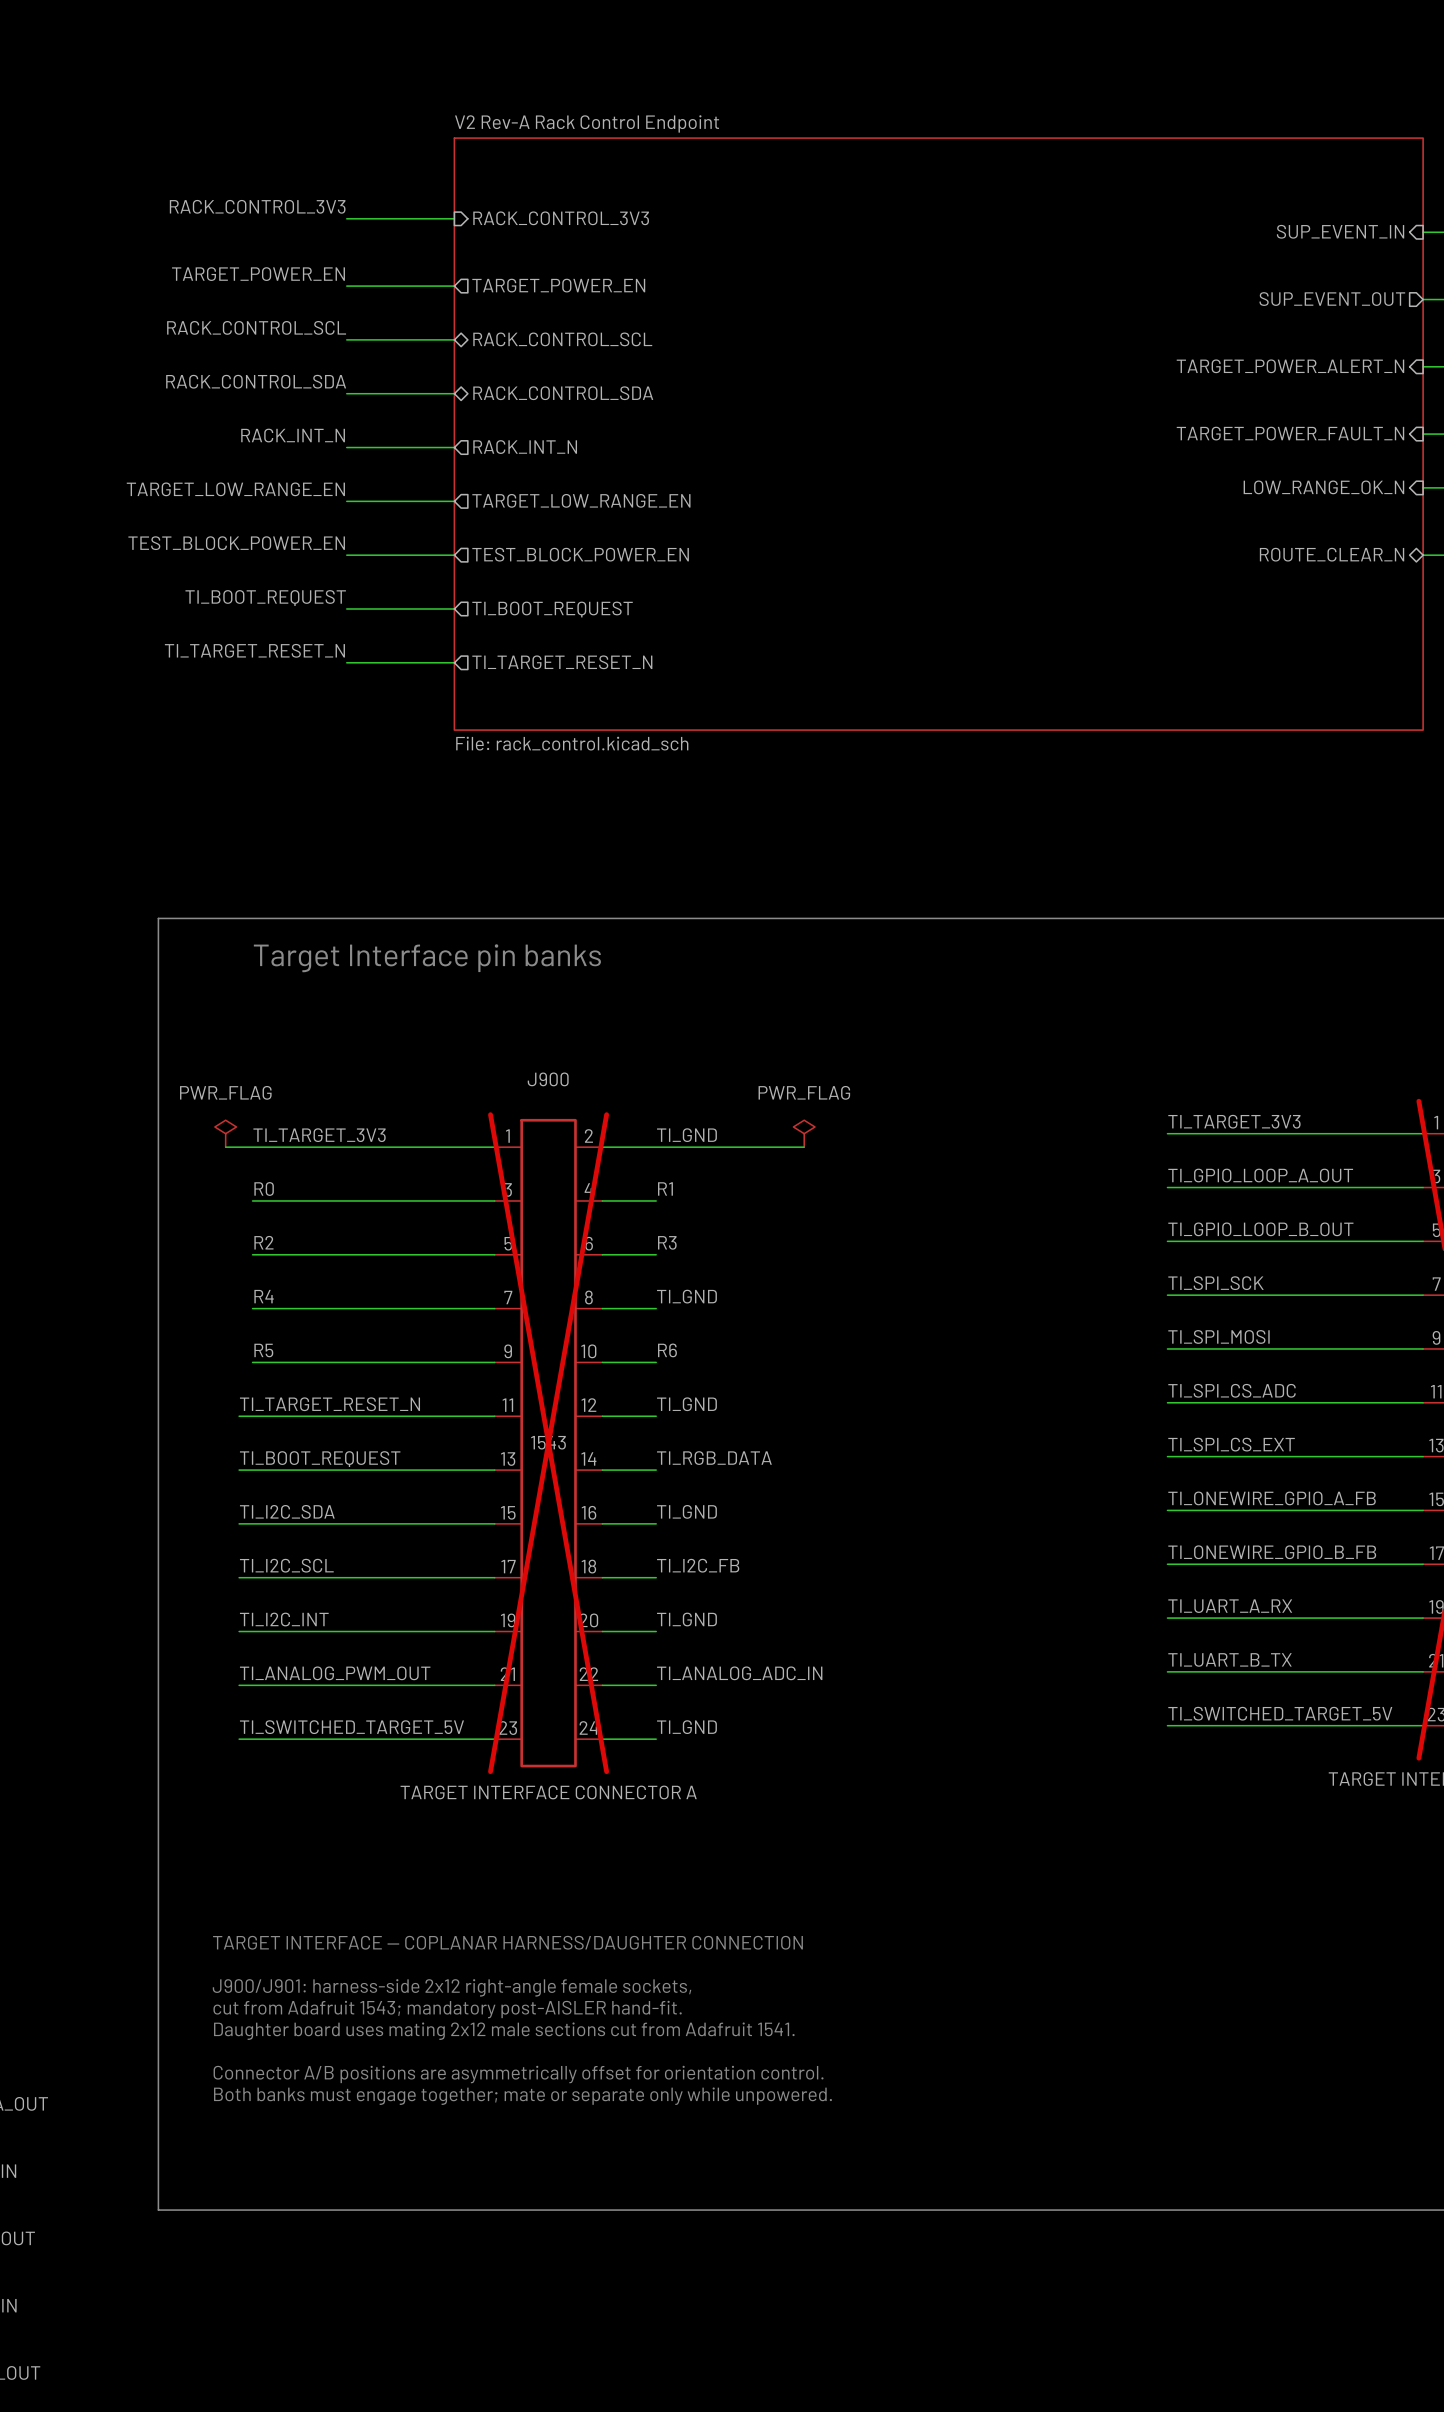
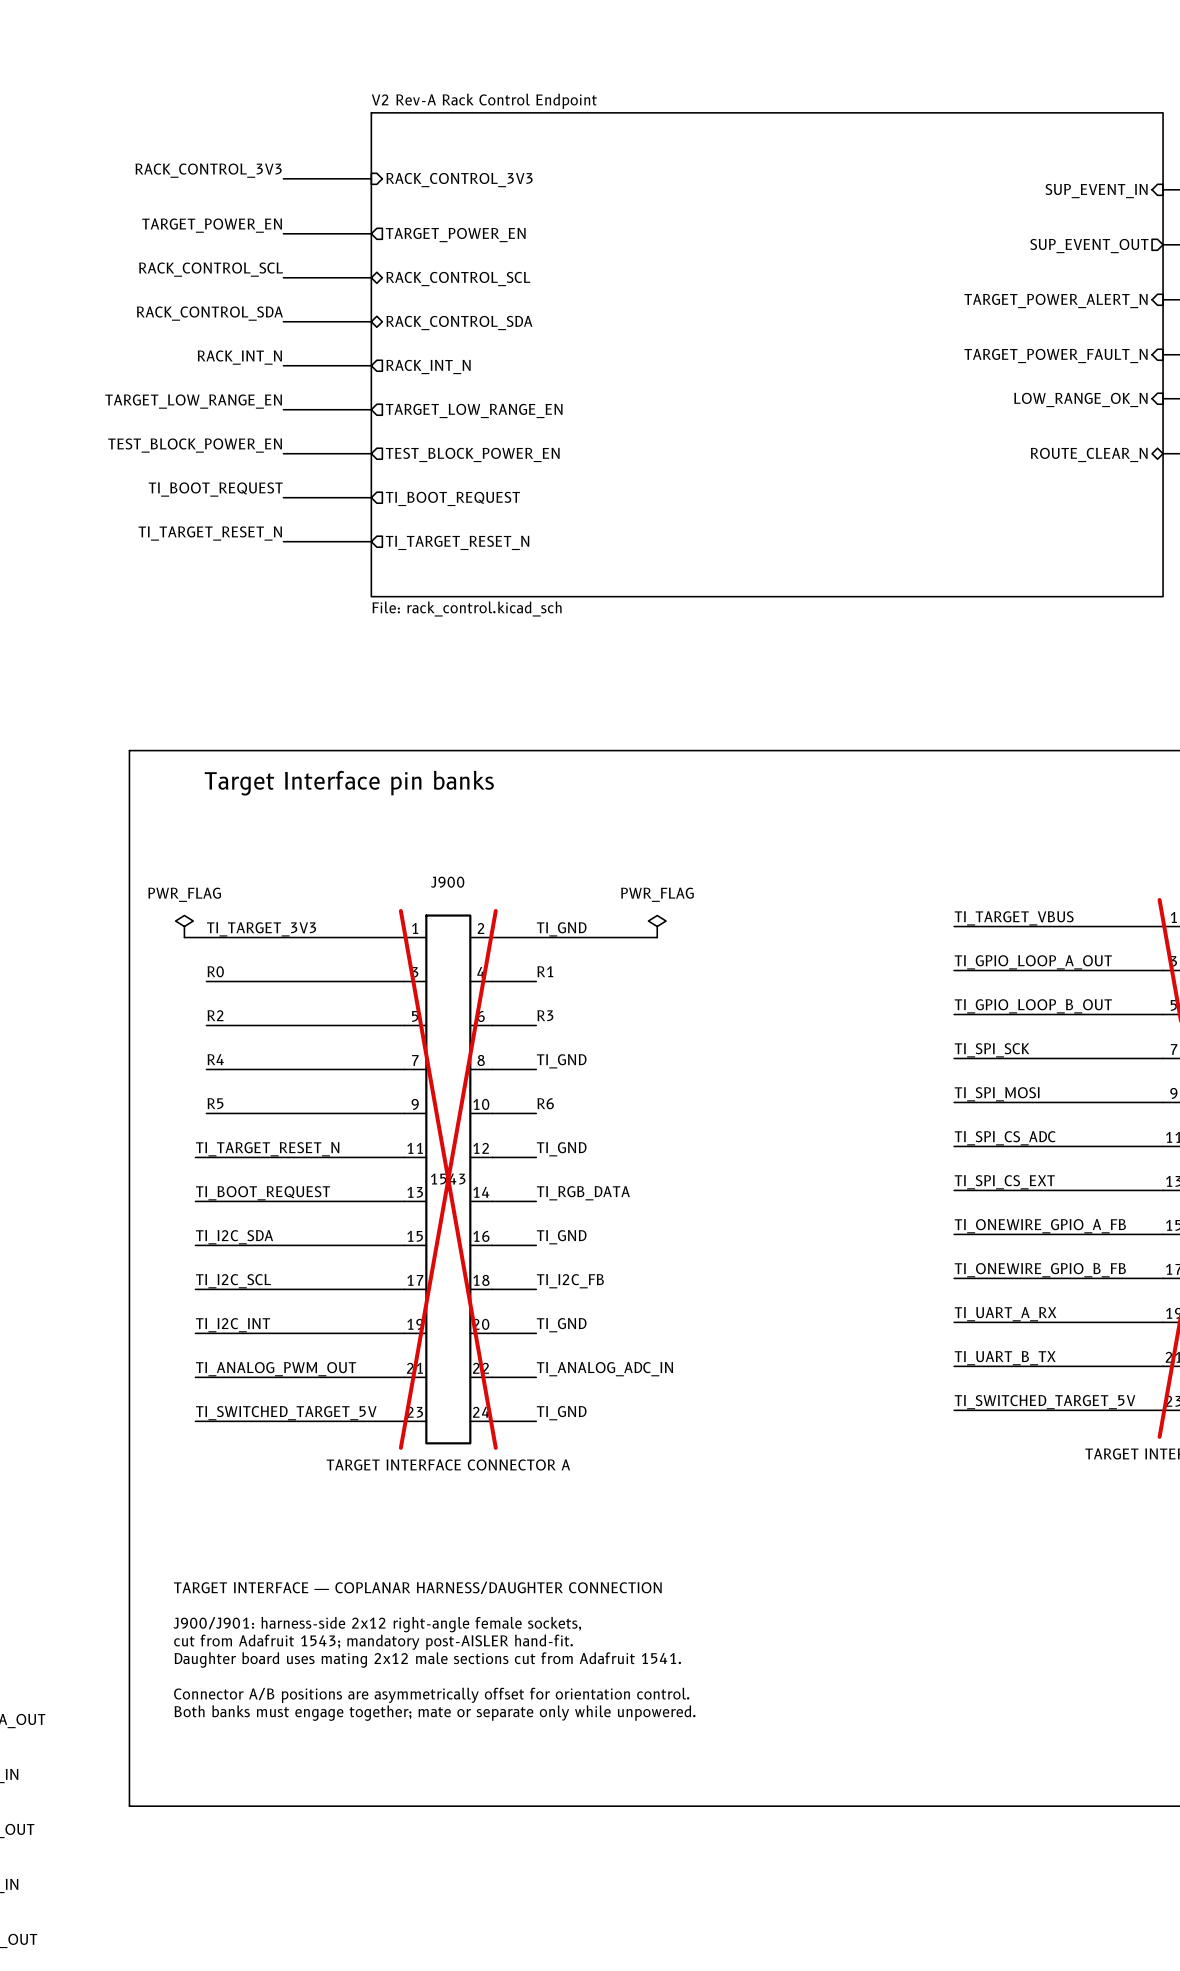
label: TI_TARGET_3V3 (1234, 1121) -> TI_TARGET_VBUS (1014, 918)

